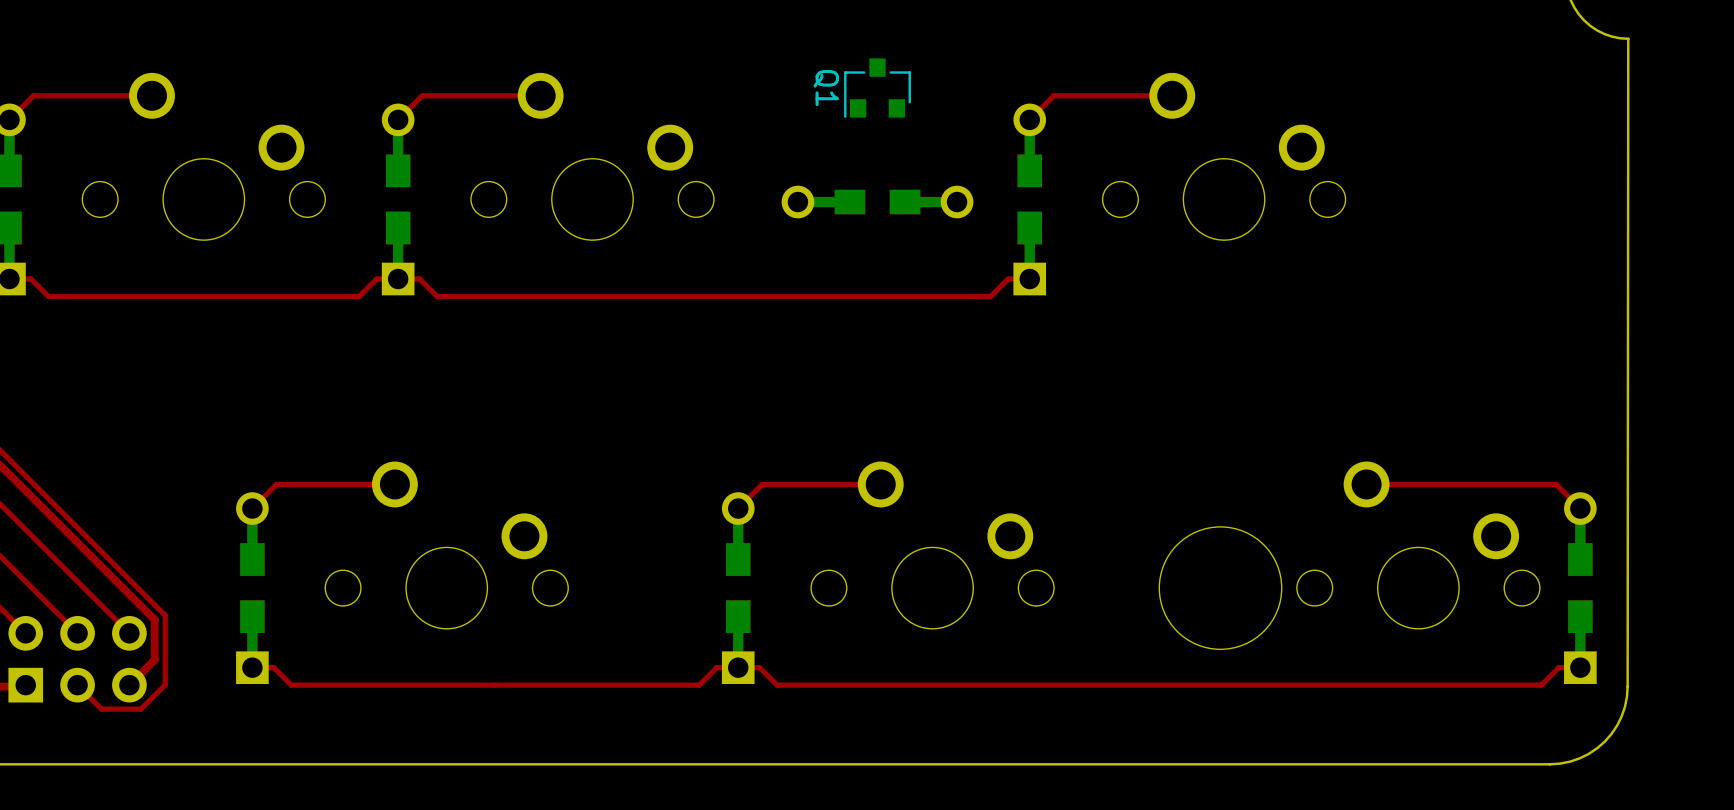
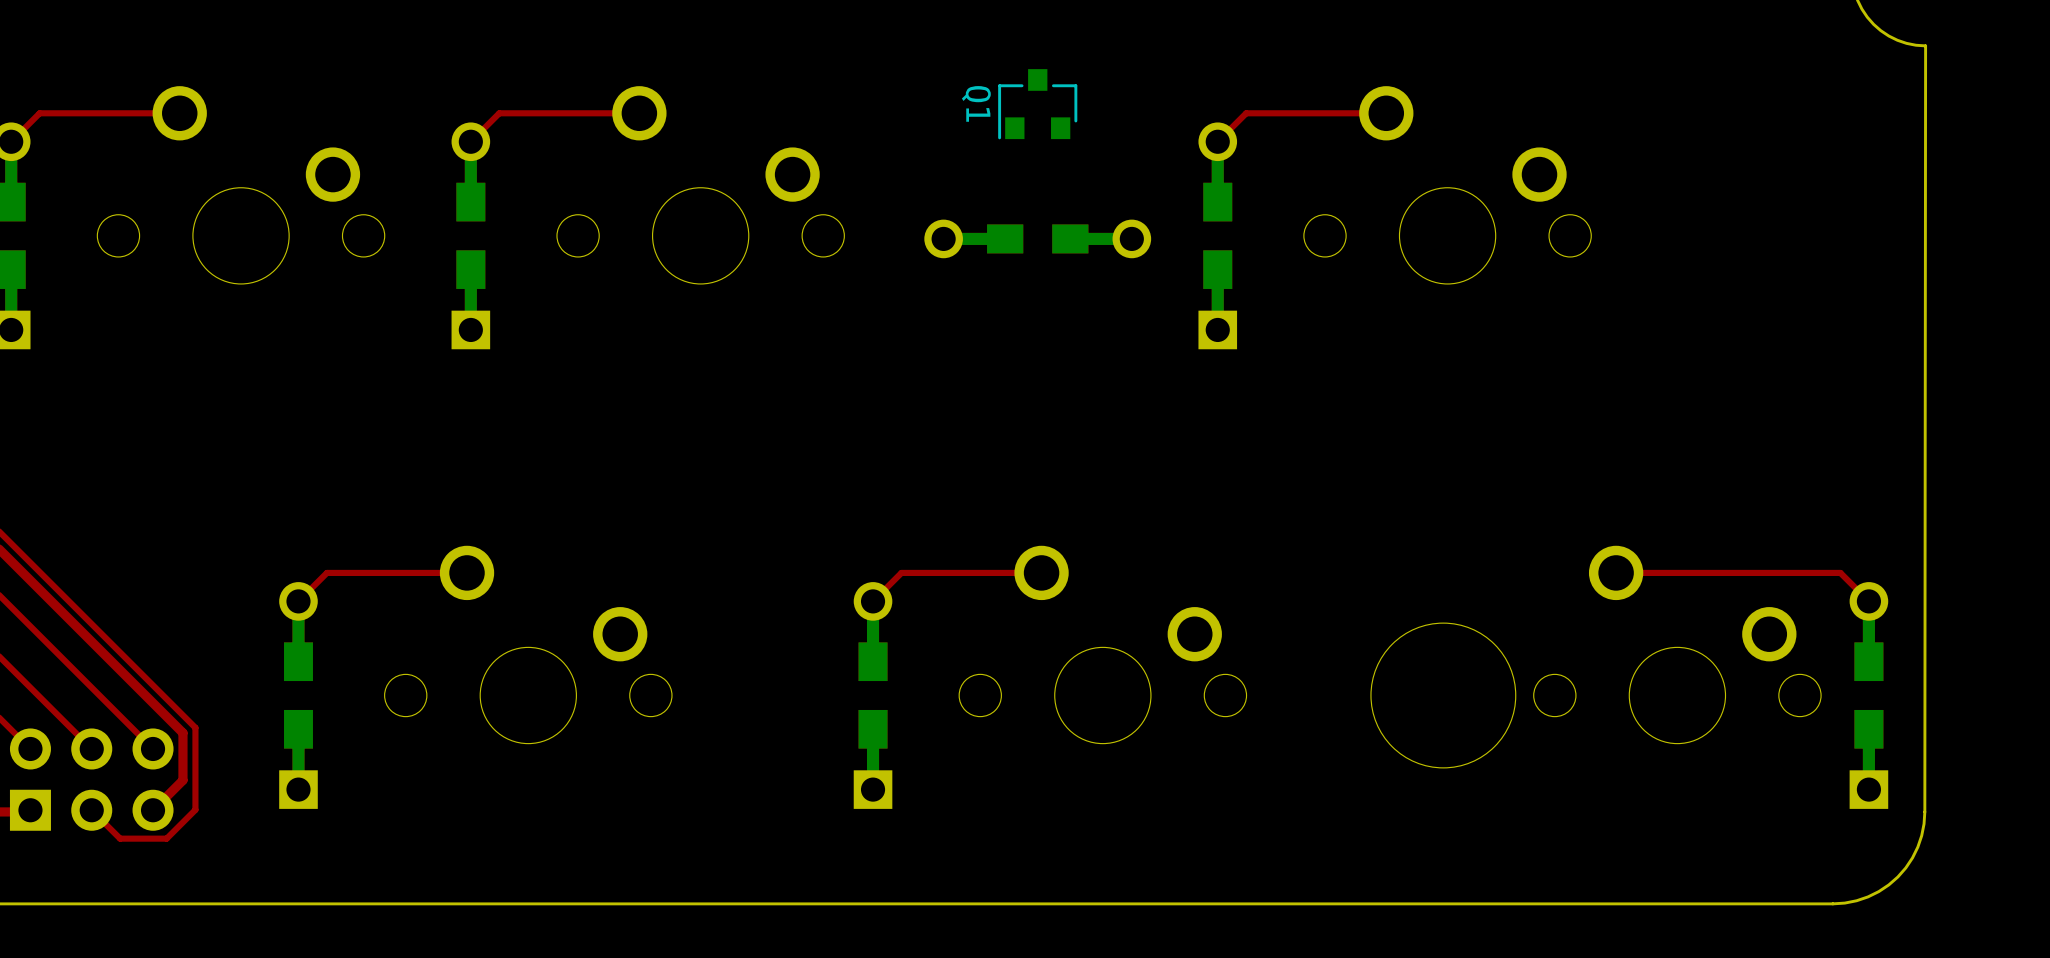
top track: (1029, 279) (1008, 279) (990, 296) (437, 296) (419, 279) (376, 279) (359, 296) (48, 296) (30, 279) (9, 279) -> none
top track: (1580, 667) (1558, 667) (1541, 685) (777, 685) (759, 667) (716, 667) (699, 685) (291, 685) (273, 667) (252, 667) -> none

